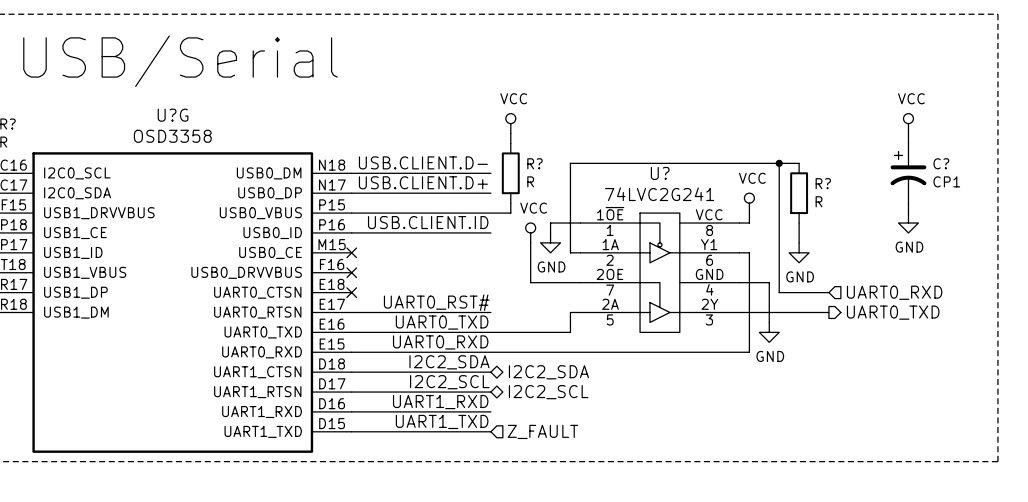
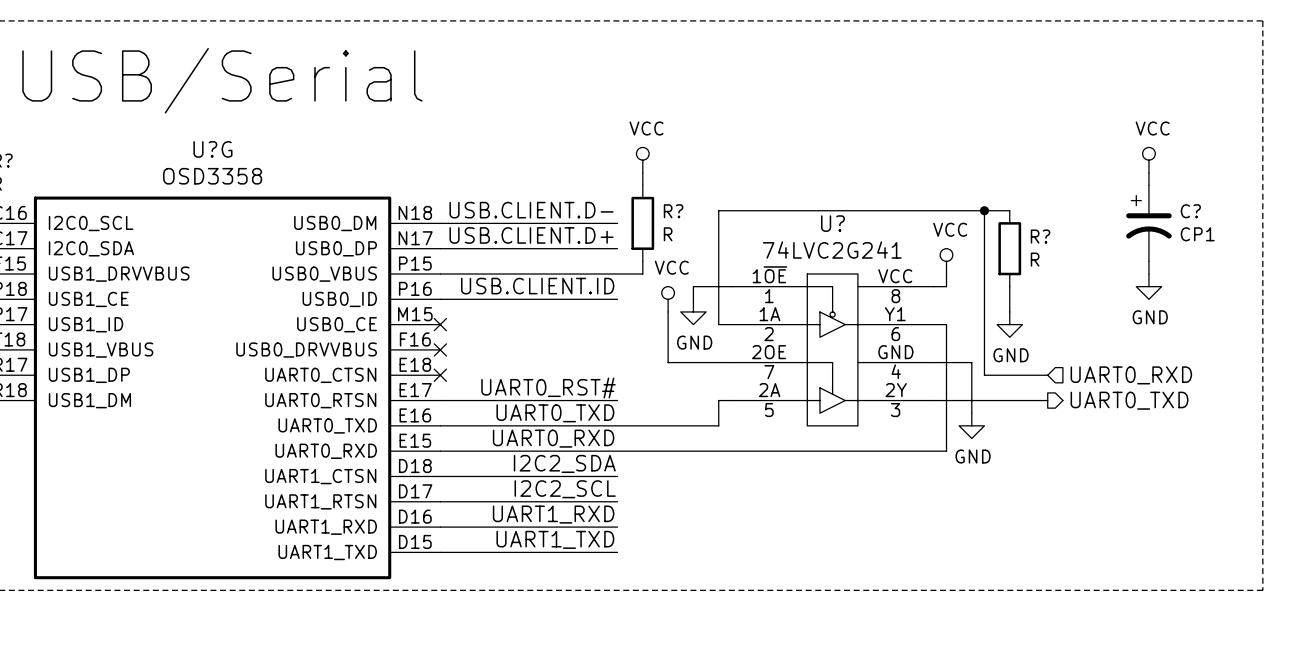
hierarchical label: I2C2_SDA (548, 372) -> none
hierarchical label: I2C2_SCL (548, 392) -> none
hierarchical label: Z_FAULT (542, 431) -> none

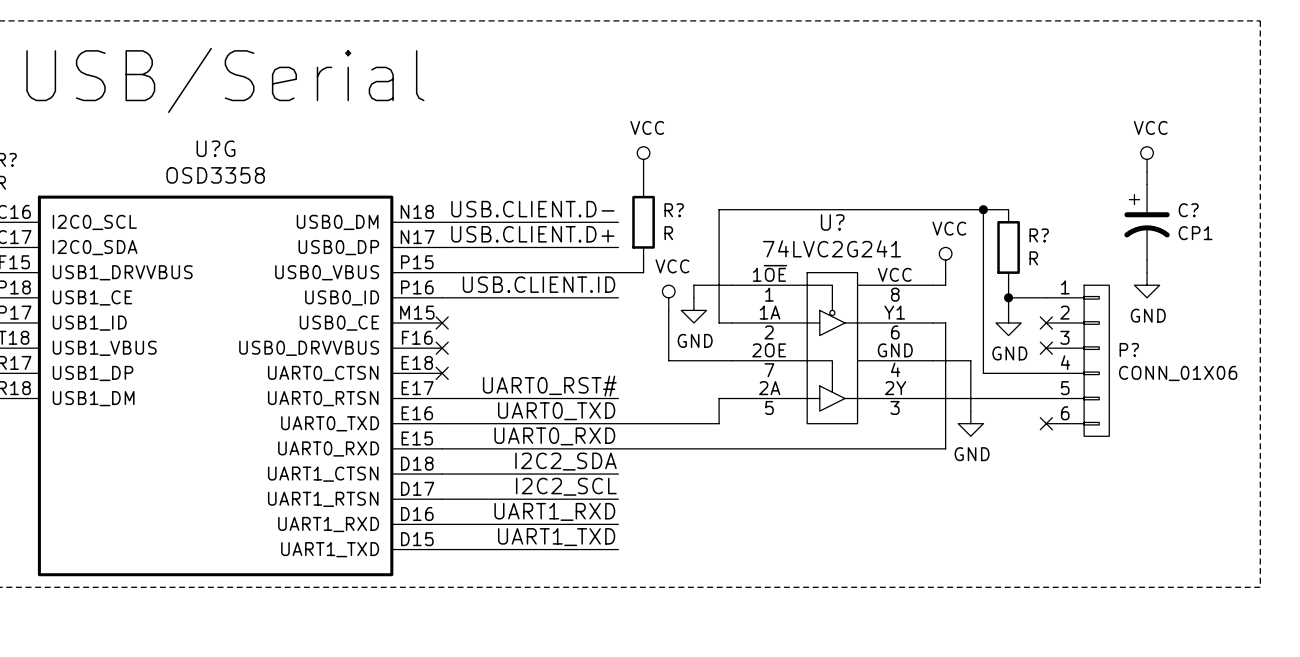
wire: none -> (1008, 297) (1046, 297)
junction: none -> (1008, 297)
no-connect mark: none -> (1046, 322)
no-connect mark: none -> (1046, 348)
P?: none -> CONN_01X06 (1077, 360)
hierarchical label: UART0_RXD (1131, 375) -> none
hierarchical label: UART0_TXD (1129, 400) -> none
no-connect mark: none -> (1046, 423)

